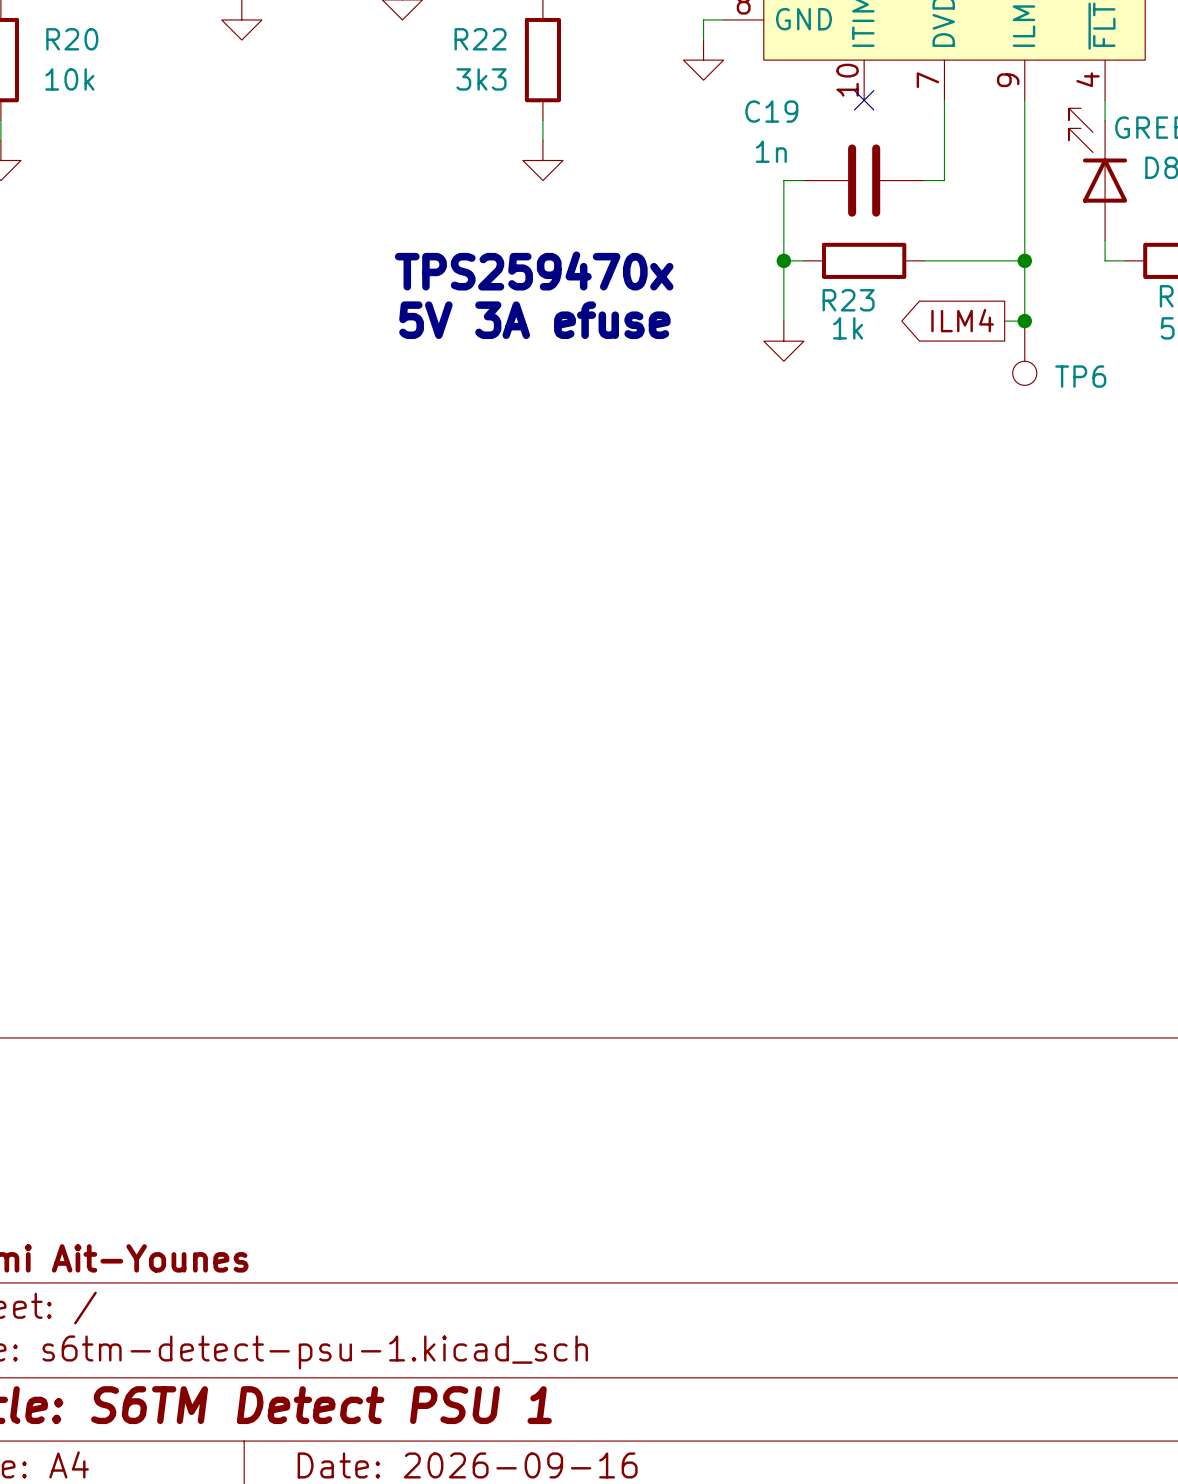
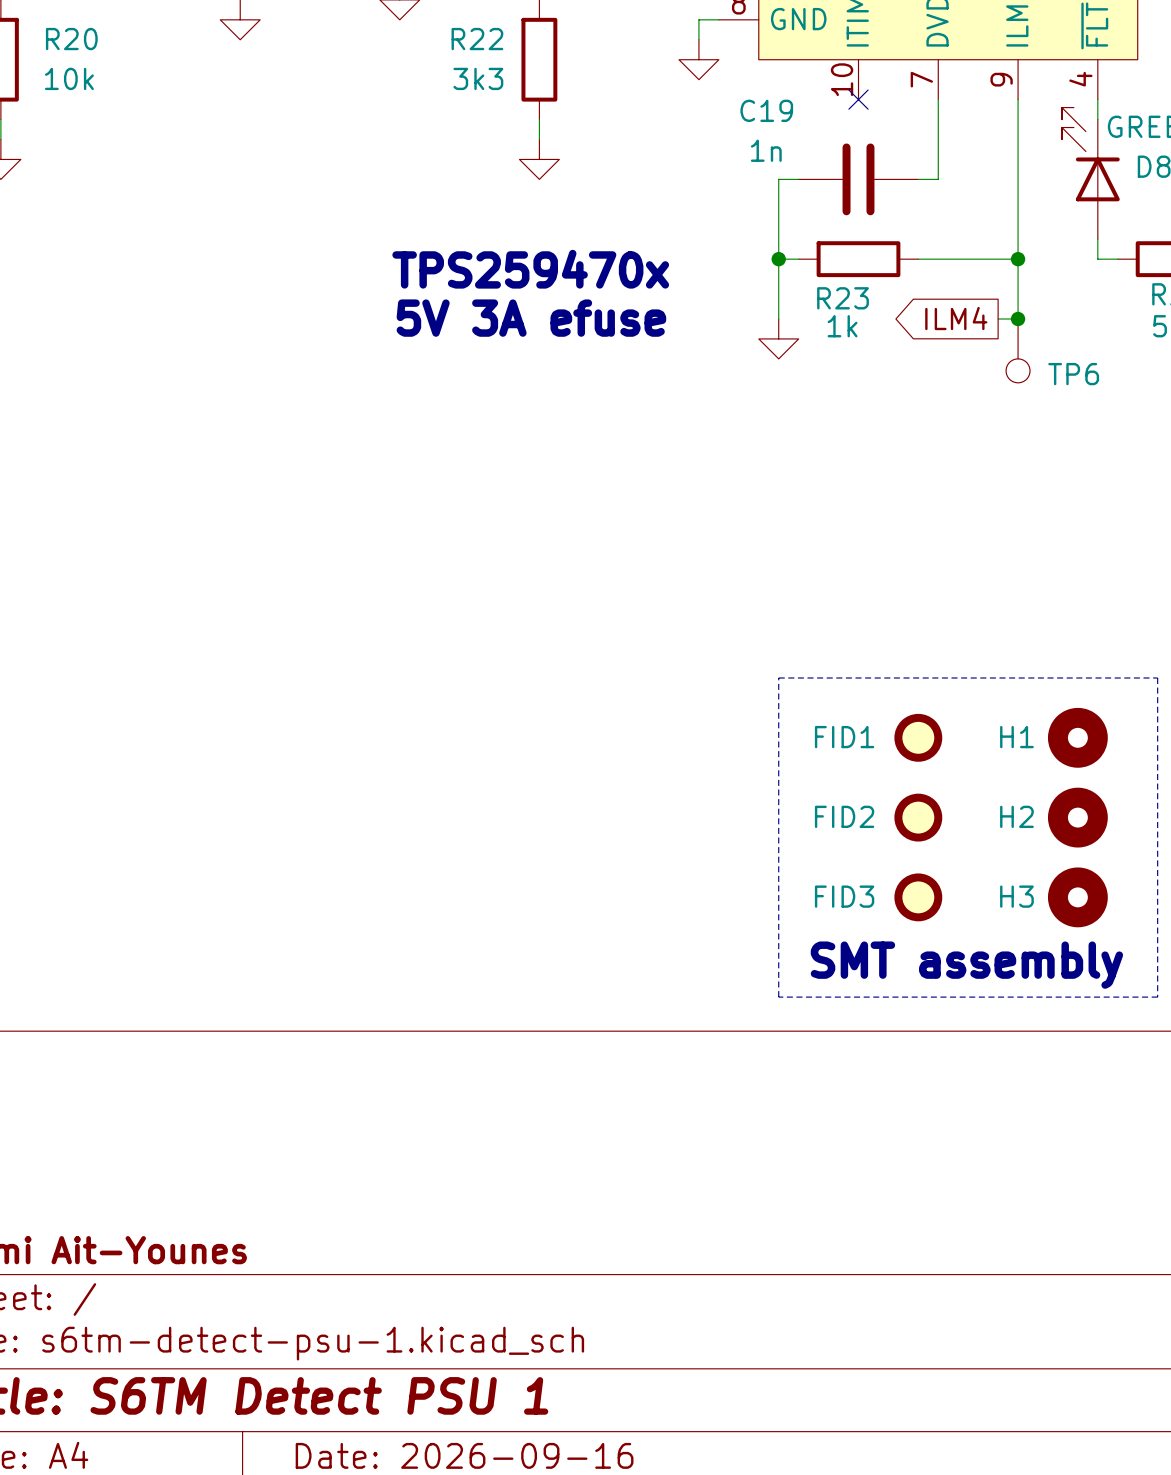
line: none -> (778, 677) (1157, 677) (1157, 997) (778, 997) (778, 677)
FID1: none -> (918, 737)
H1: none -> (1077, 737)
FID2: none -> (918, 817)
H2: none -> (1077, 817)
FID3: none -> (918, 897)
H3: none -> (1077, 897)
text: none -> SMT assembly (966, 965)

